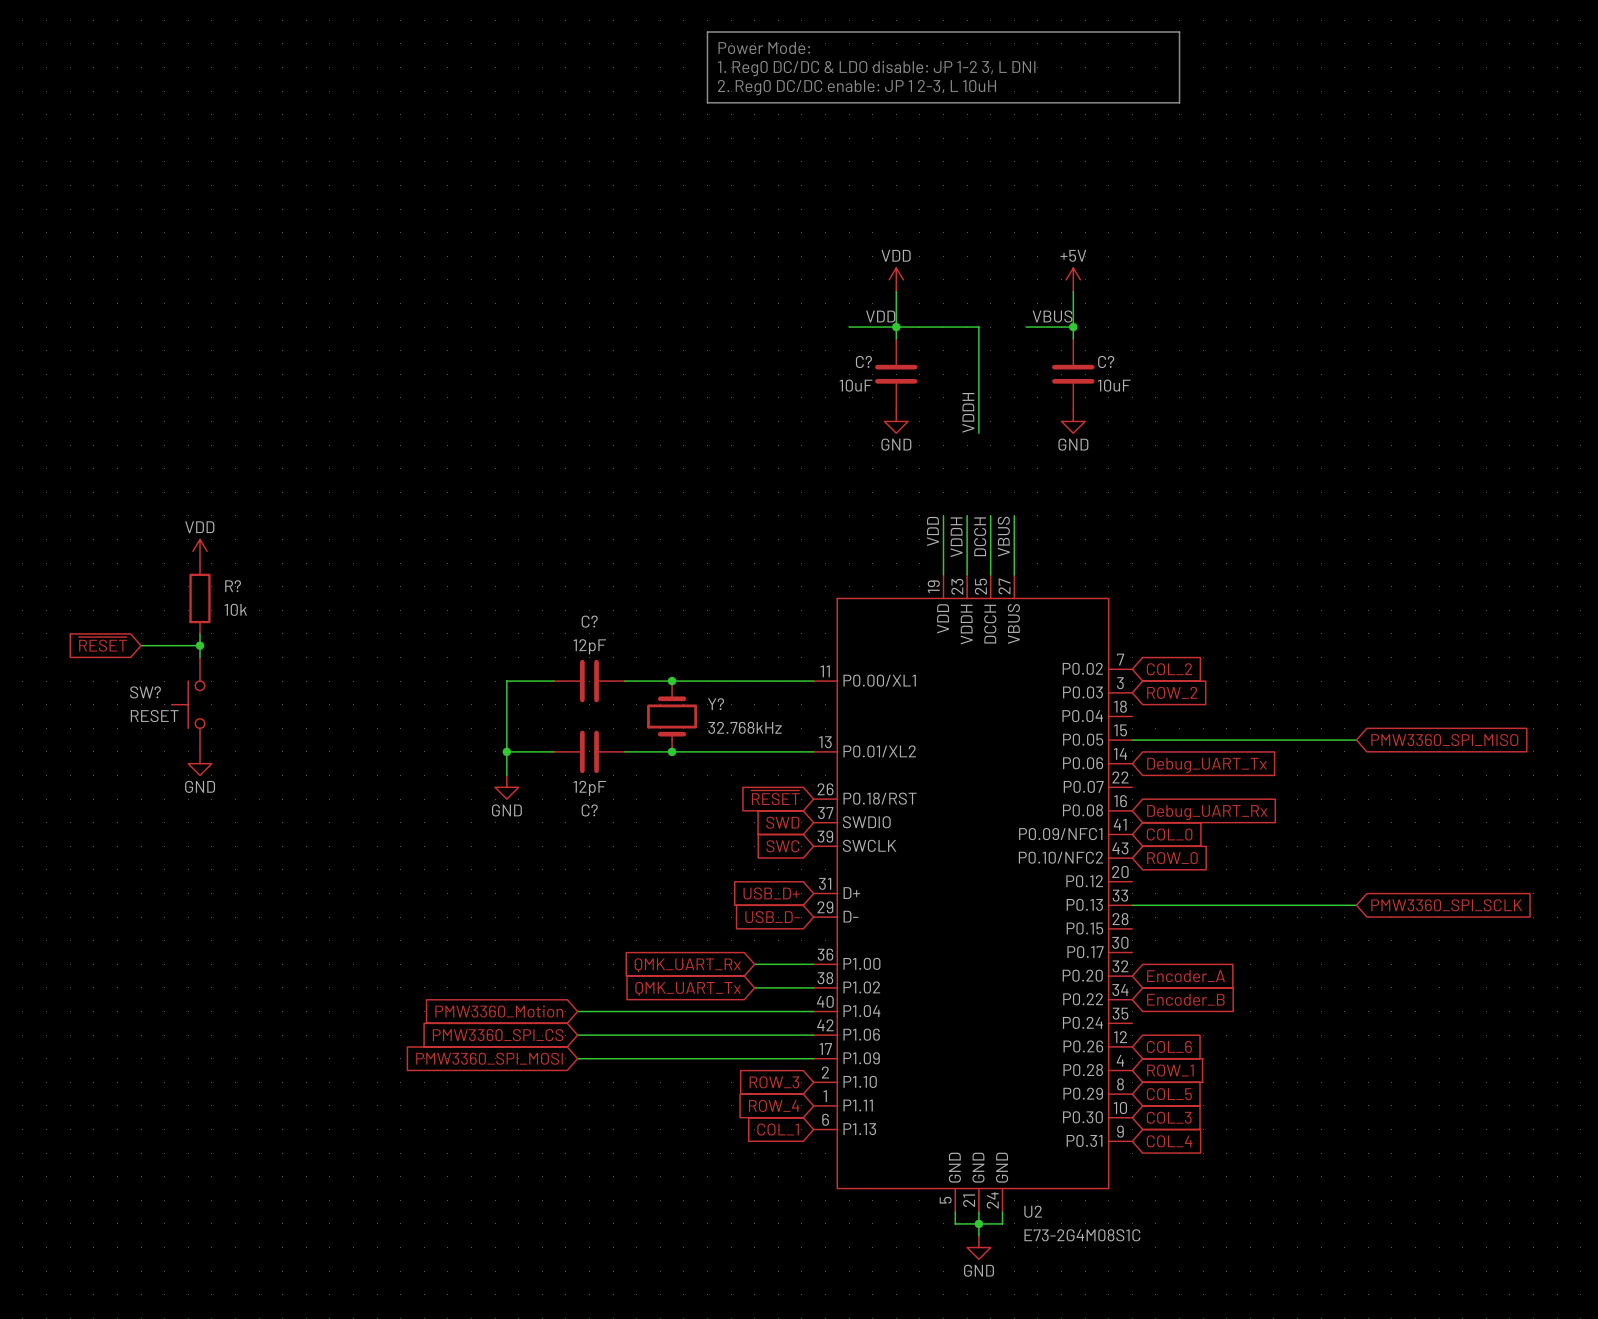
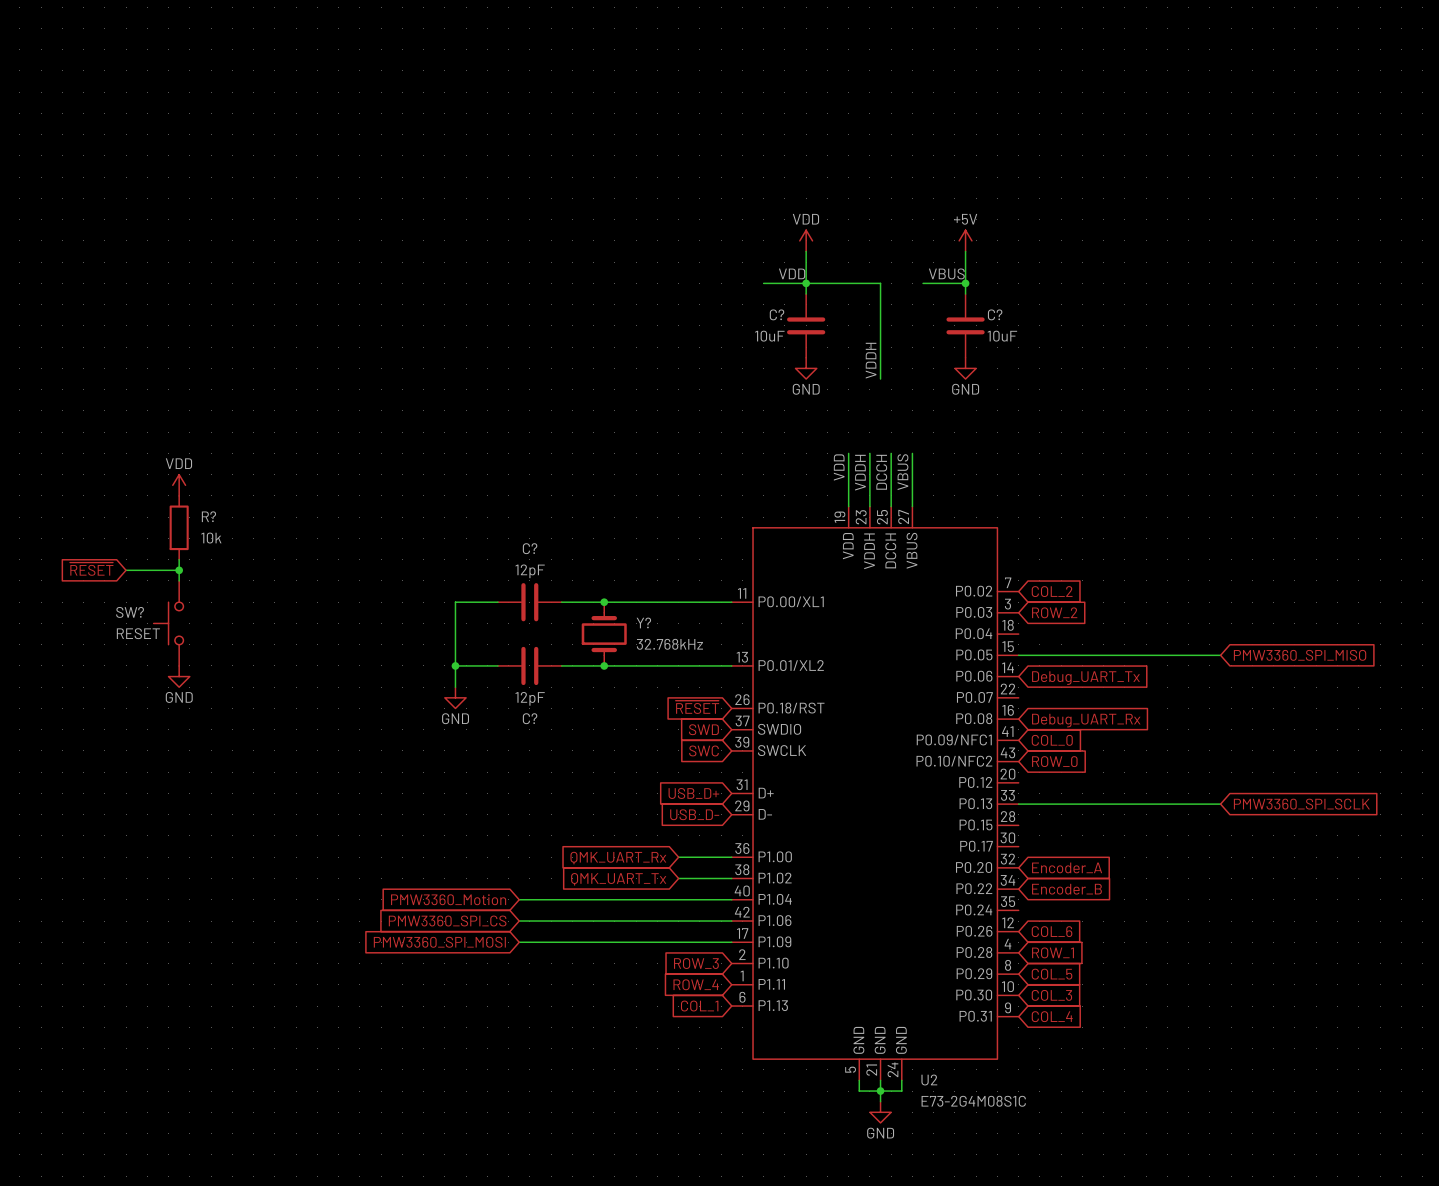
line: (707, 32) (1179, 32) (1179, 102) (707, 102) (707, 32) -> none
text: Power Mode: (764, 48) -> none
text: 1. Reg0 DC/DC & LDO disable: JP 1-2 3, L DNI (876, 68) -> none
text: 2. Reg0 DC/DC enable: JP 1 2-3, L 10uH (857, 87) -> none

